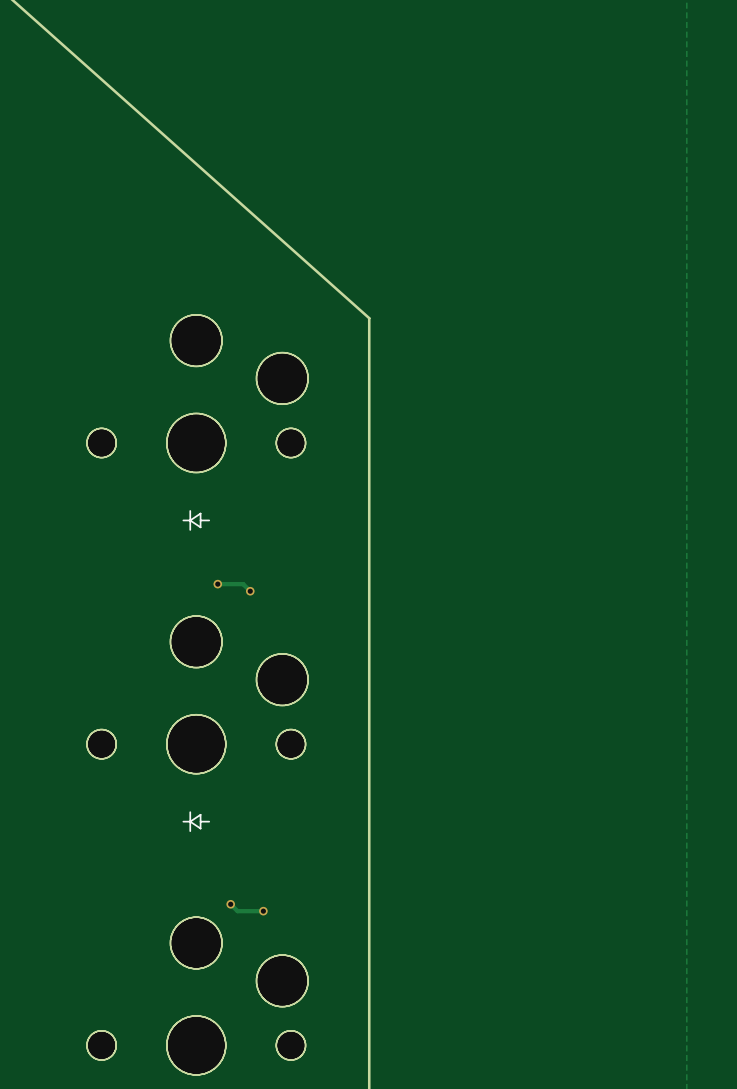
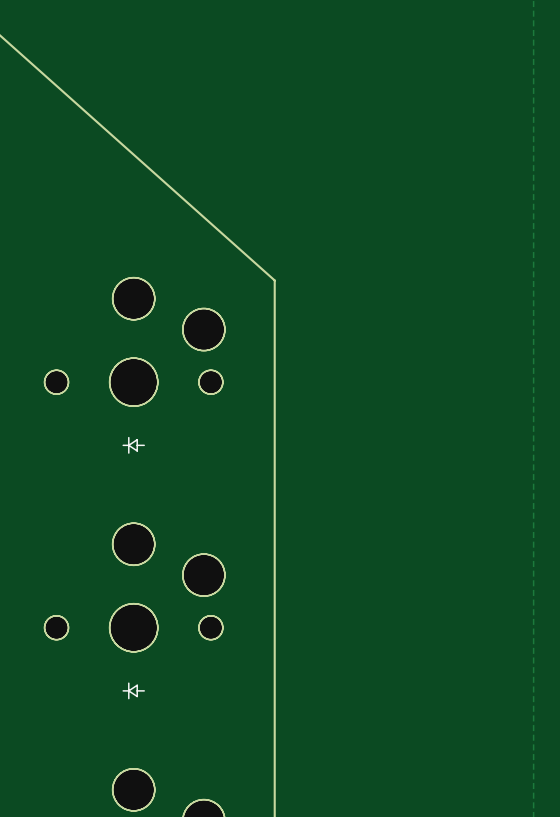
track: (217, 584) (243, 584) (250, 591) -> none
via: (217, 584) -> none
via: (250, 591) -> none
track: (230, 904) (237, 911) (263, 911) -> none
via: (230, 904) -> none
via: (263, 911) -> none

